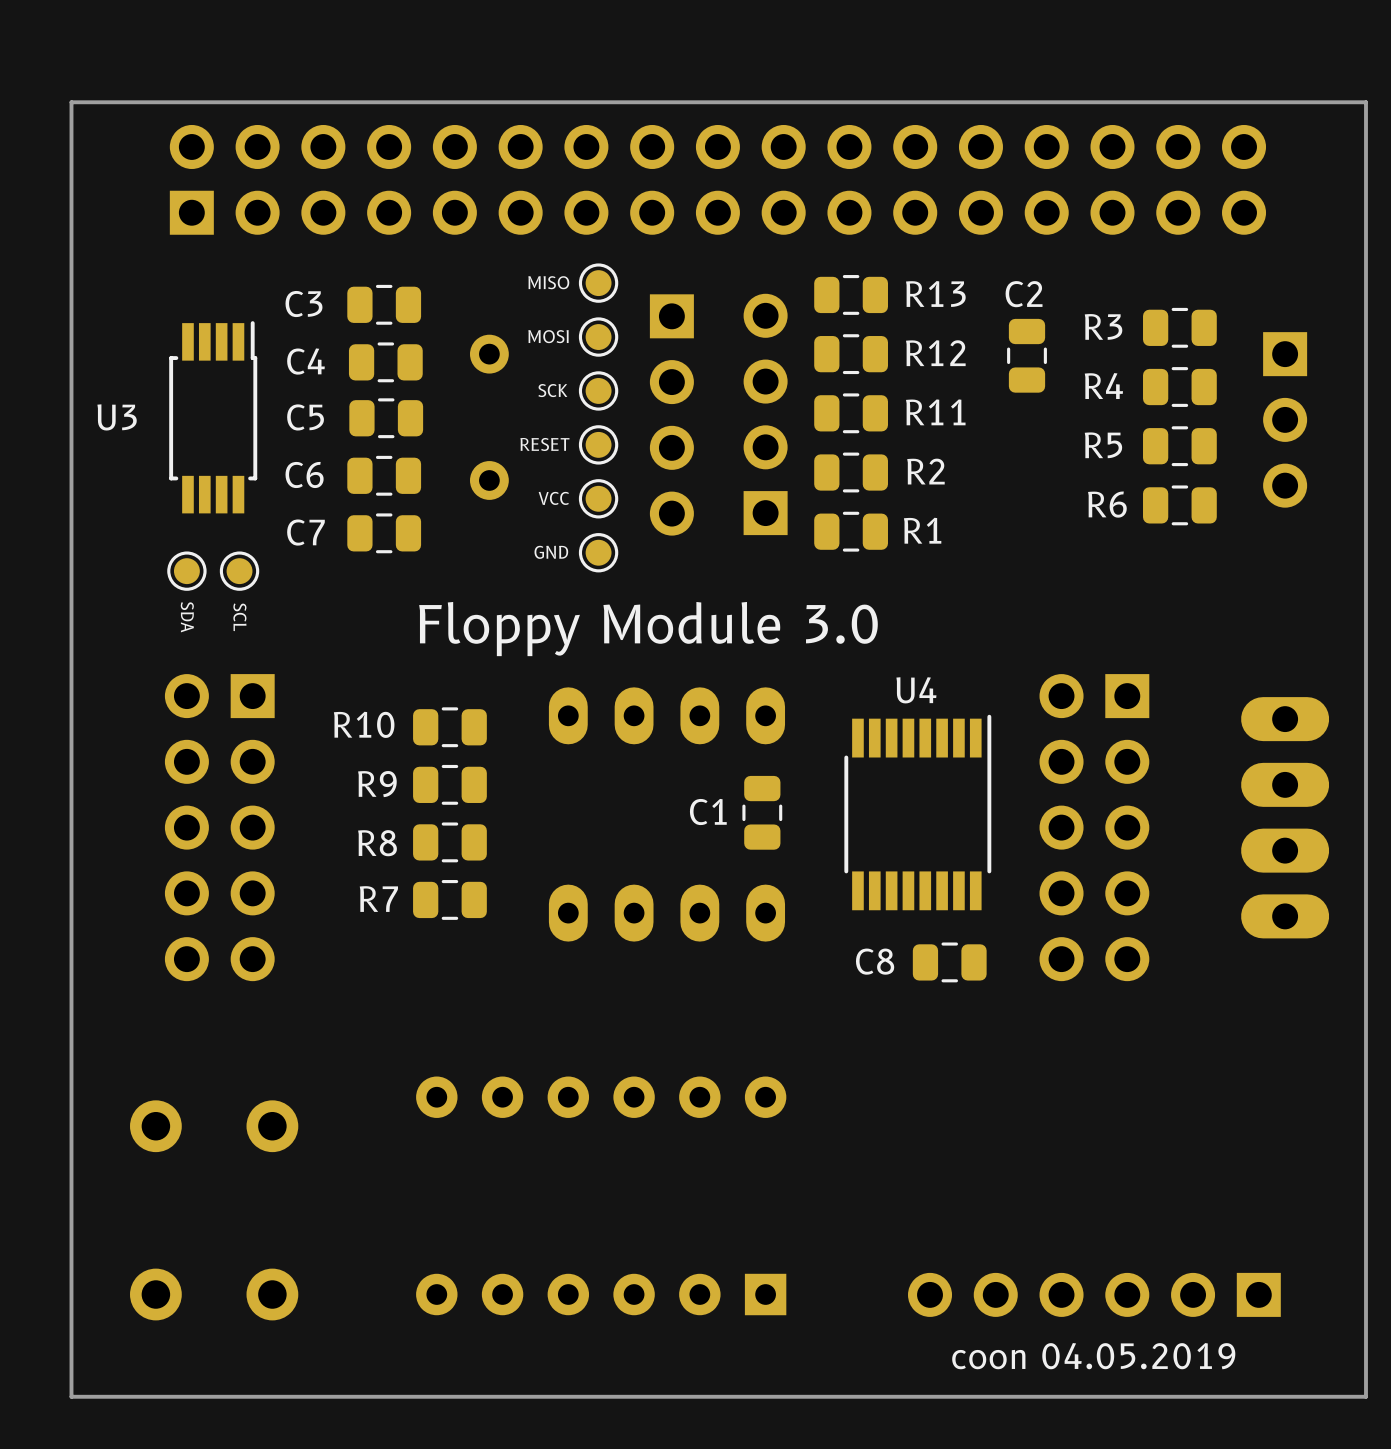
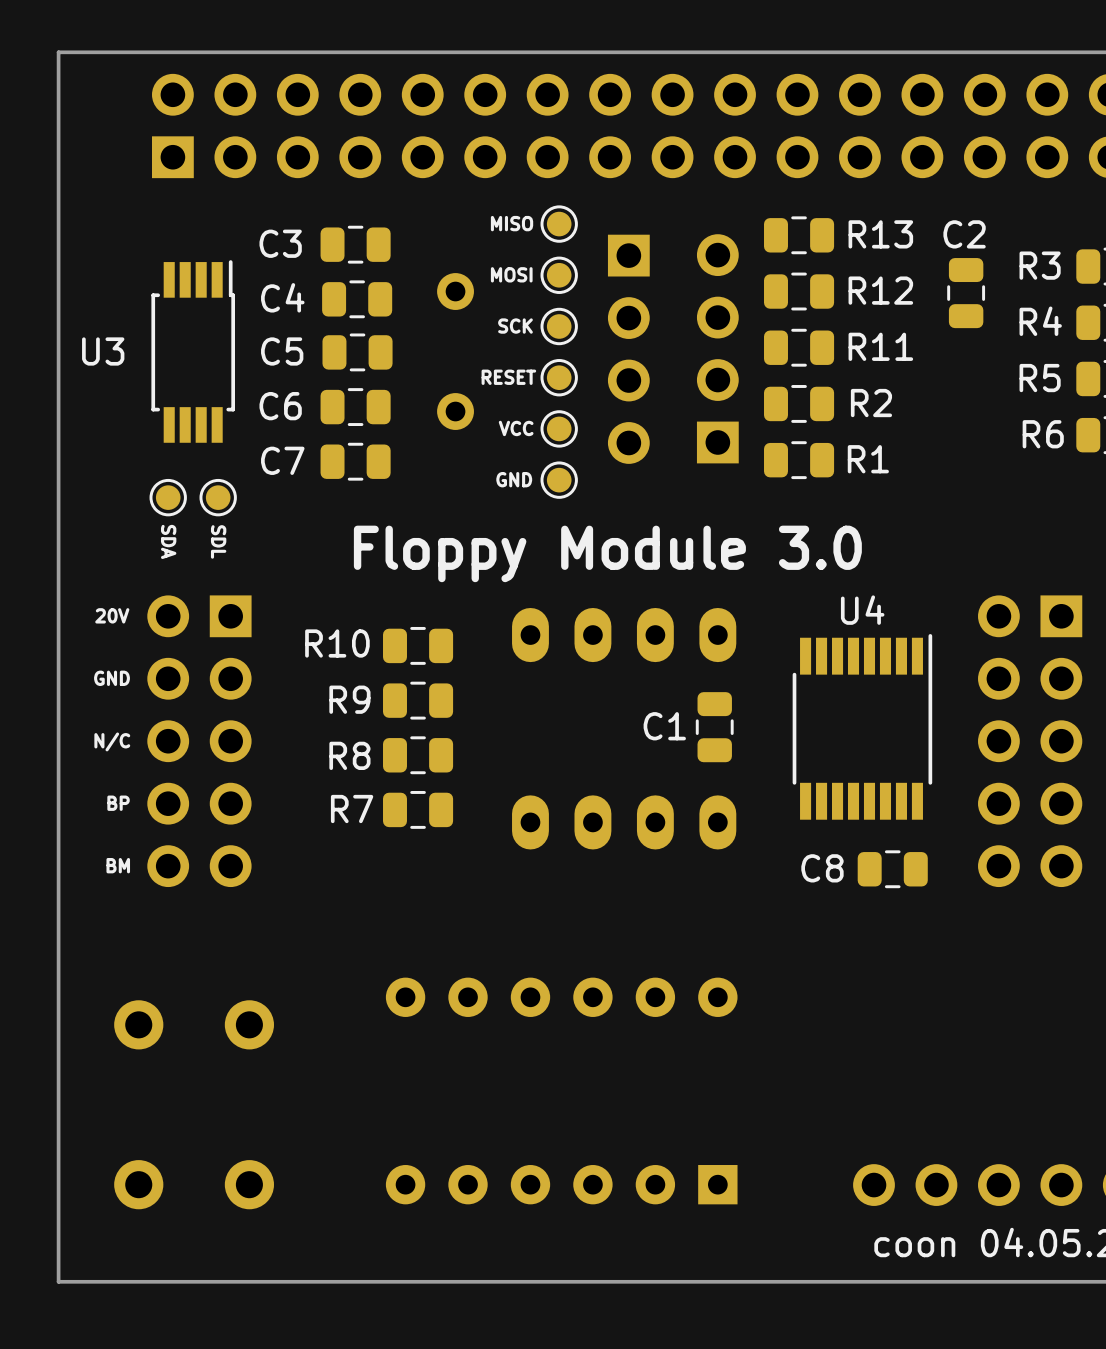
part value: SCL (239, 617) -> SDL (218, 541)
text: none -> 20V (112, 615)
text: none -> GND (112, 678)
text: none -> N/C (112, 741)
text: none -> BP (118, 803)
text: none -> BM (118, 865)

